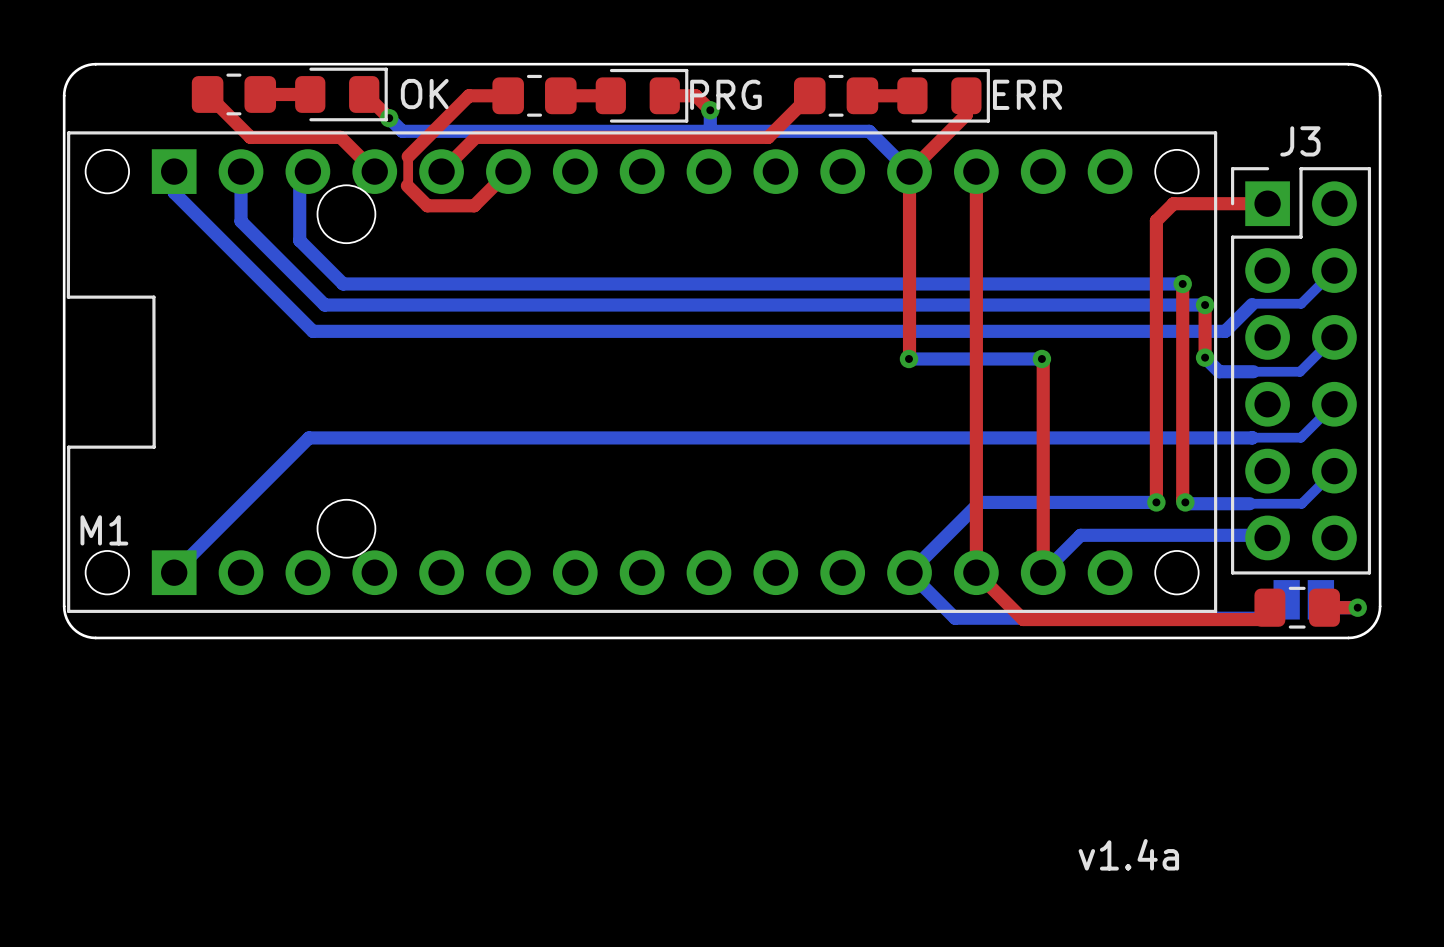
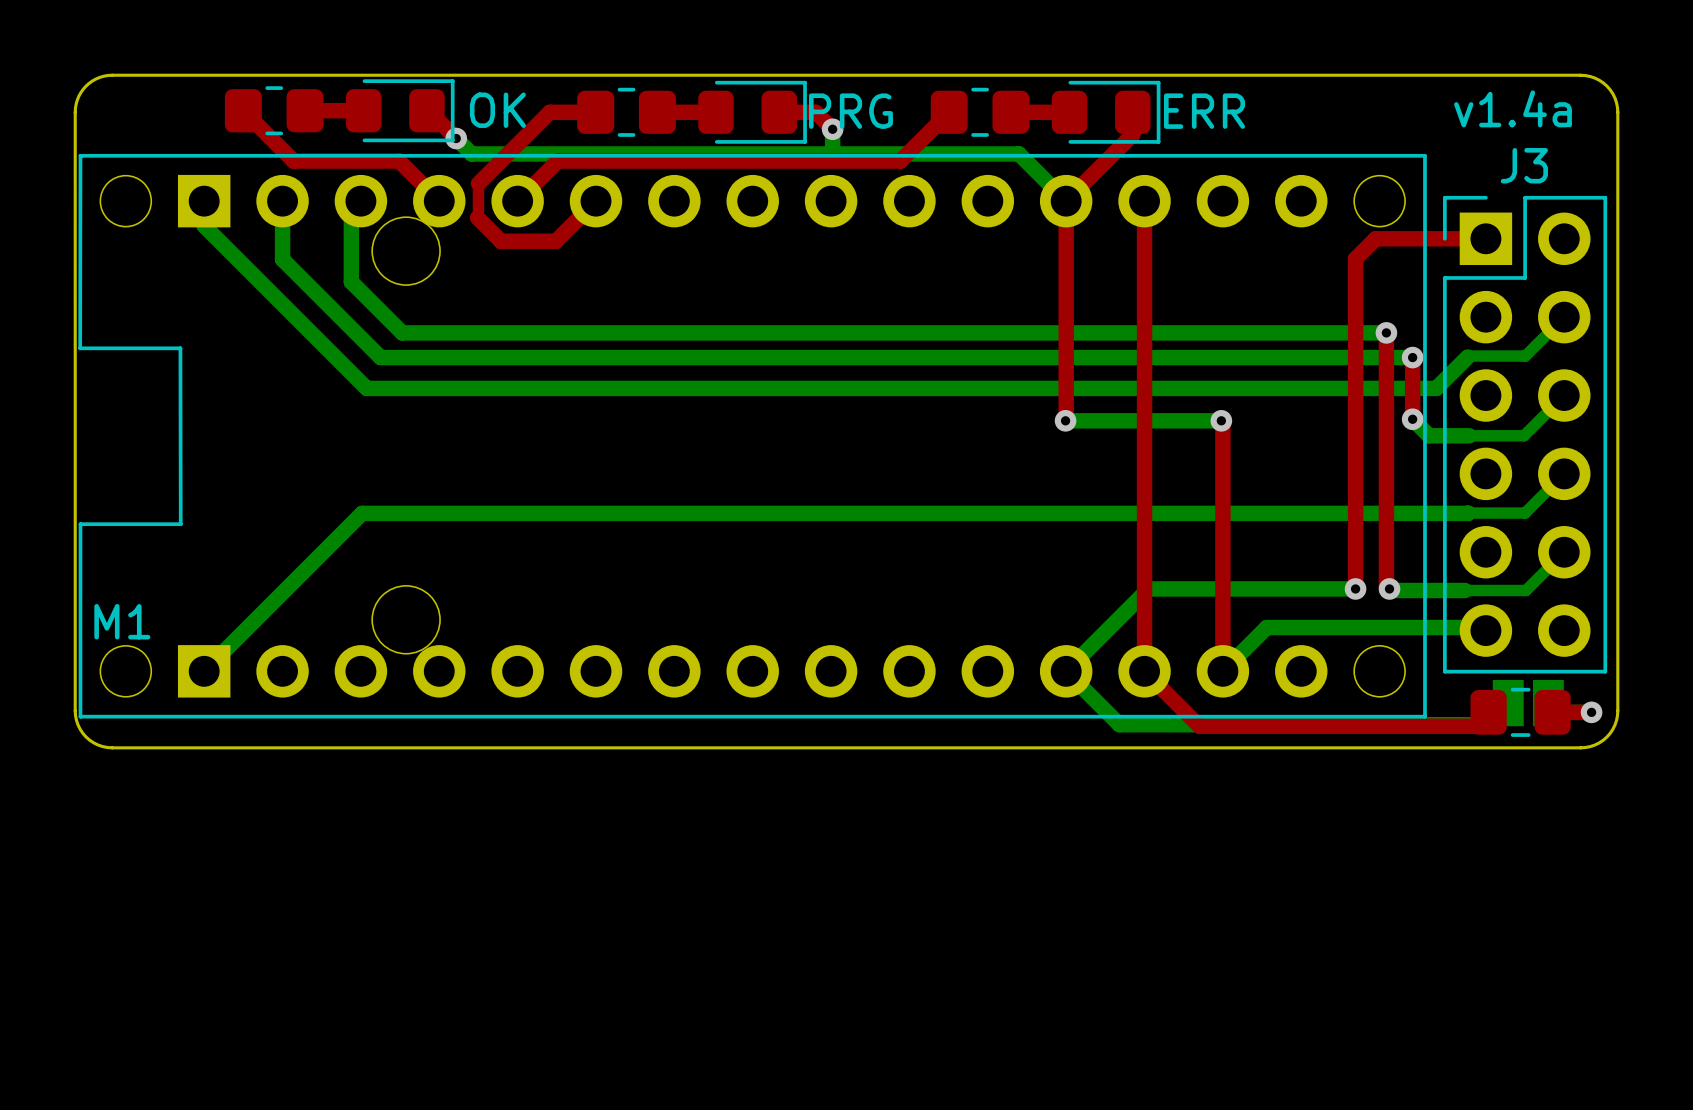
text: none -> v1.4a (1512, 108)
text: v1.4a (1128, 854) -> none

